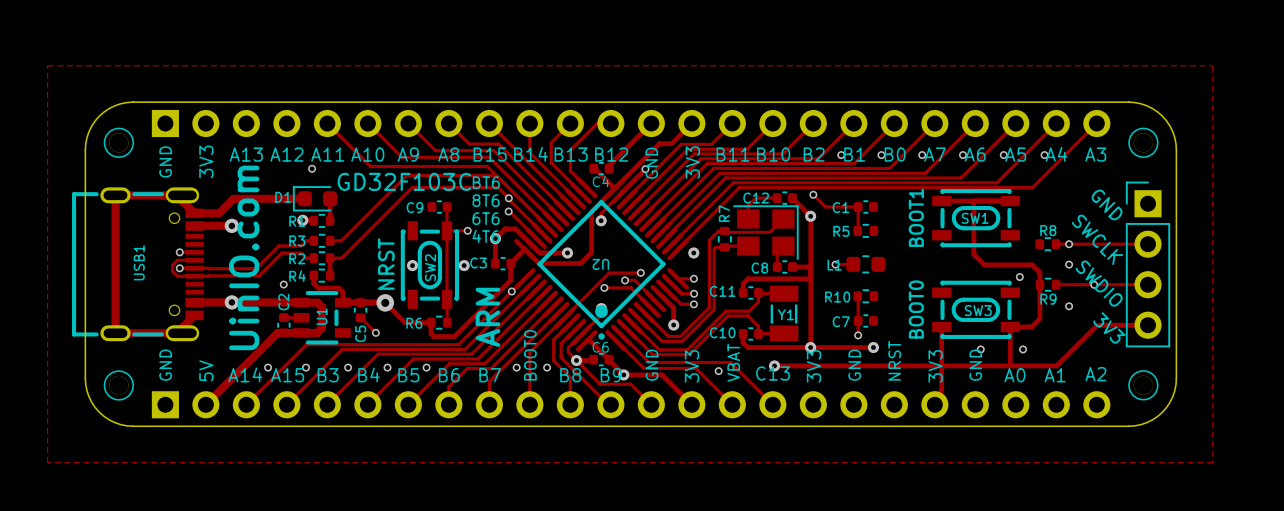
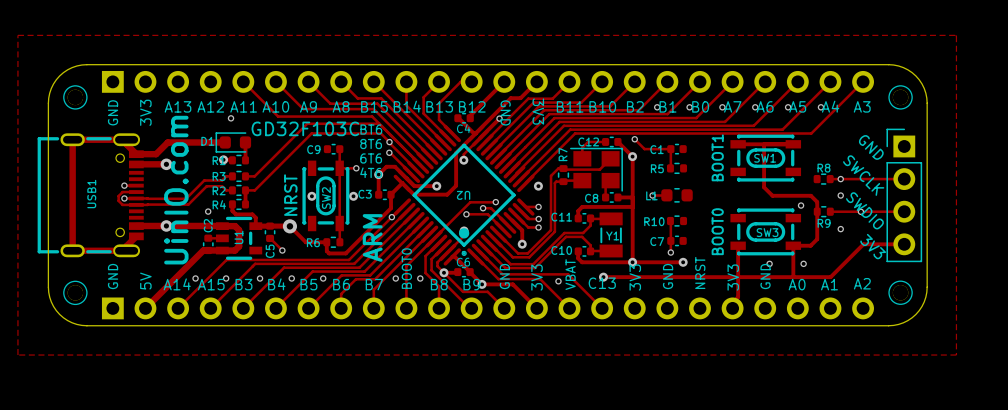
text rotation: 0° (692, 162) -> 180° (538, 111)
text rotation: 0° (651, 163) -> 180° (505, 112)

